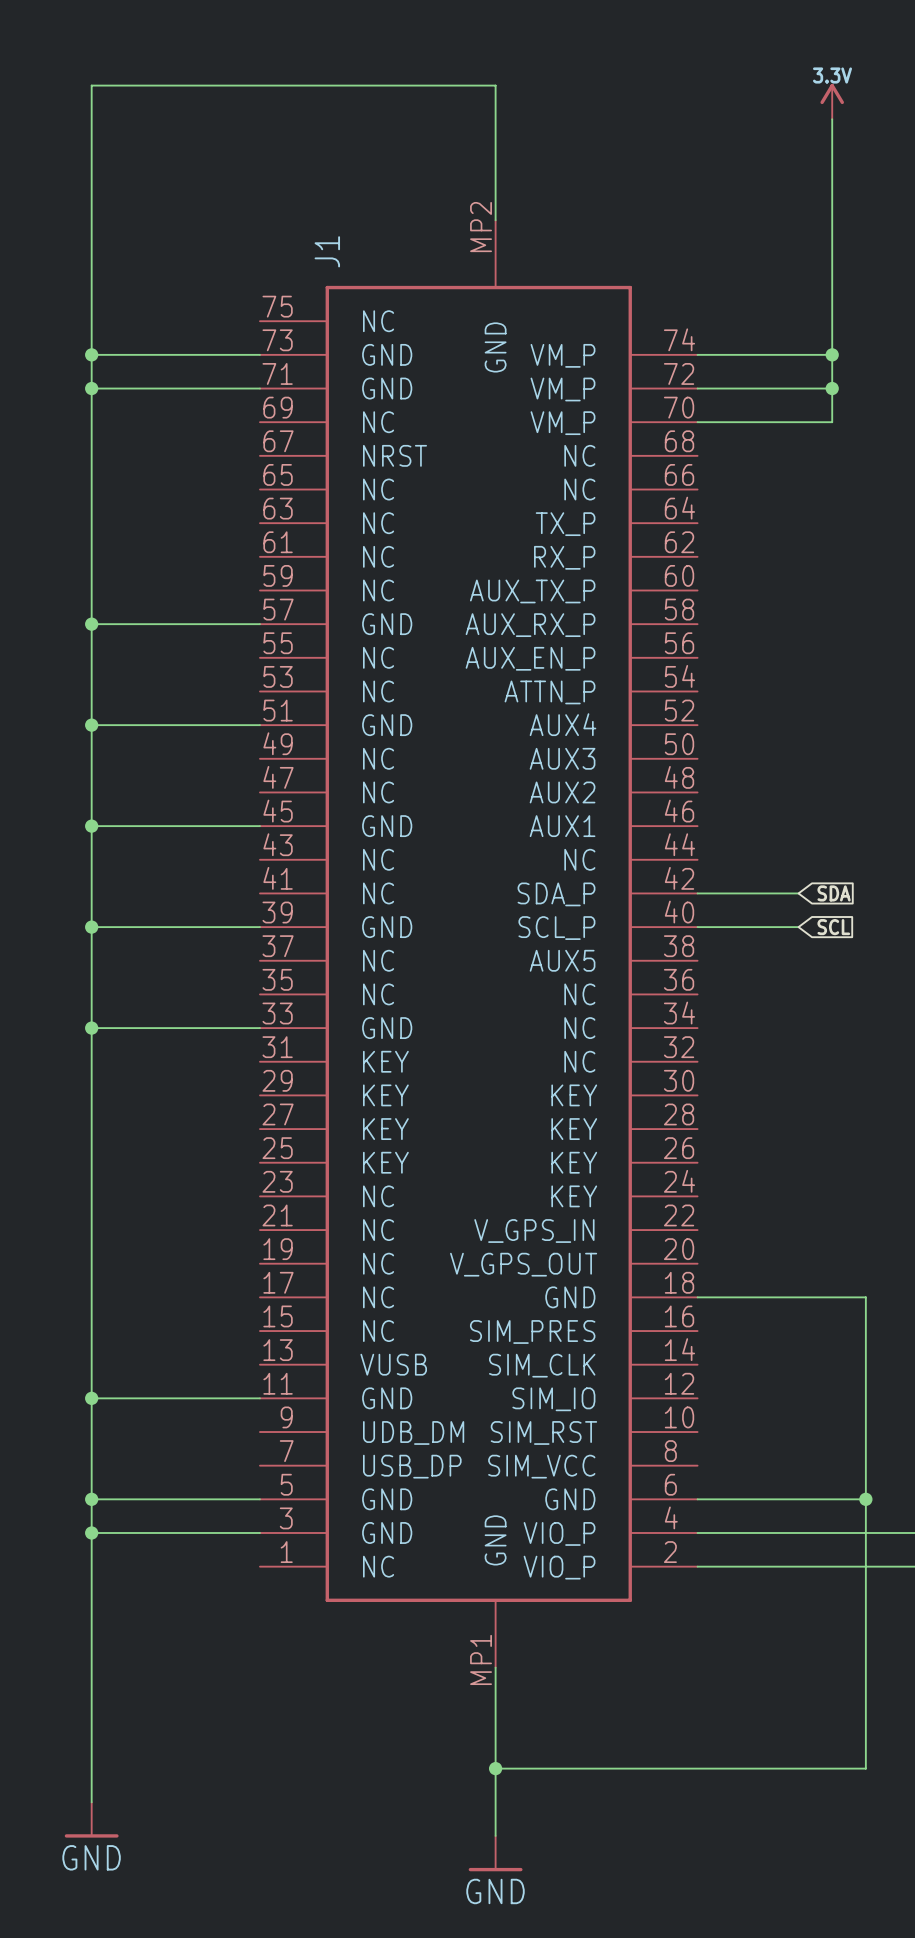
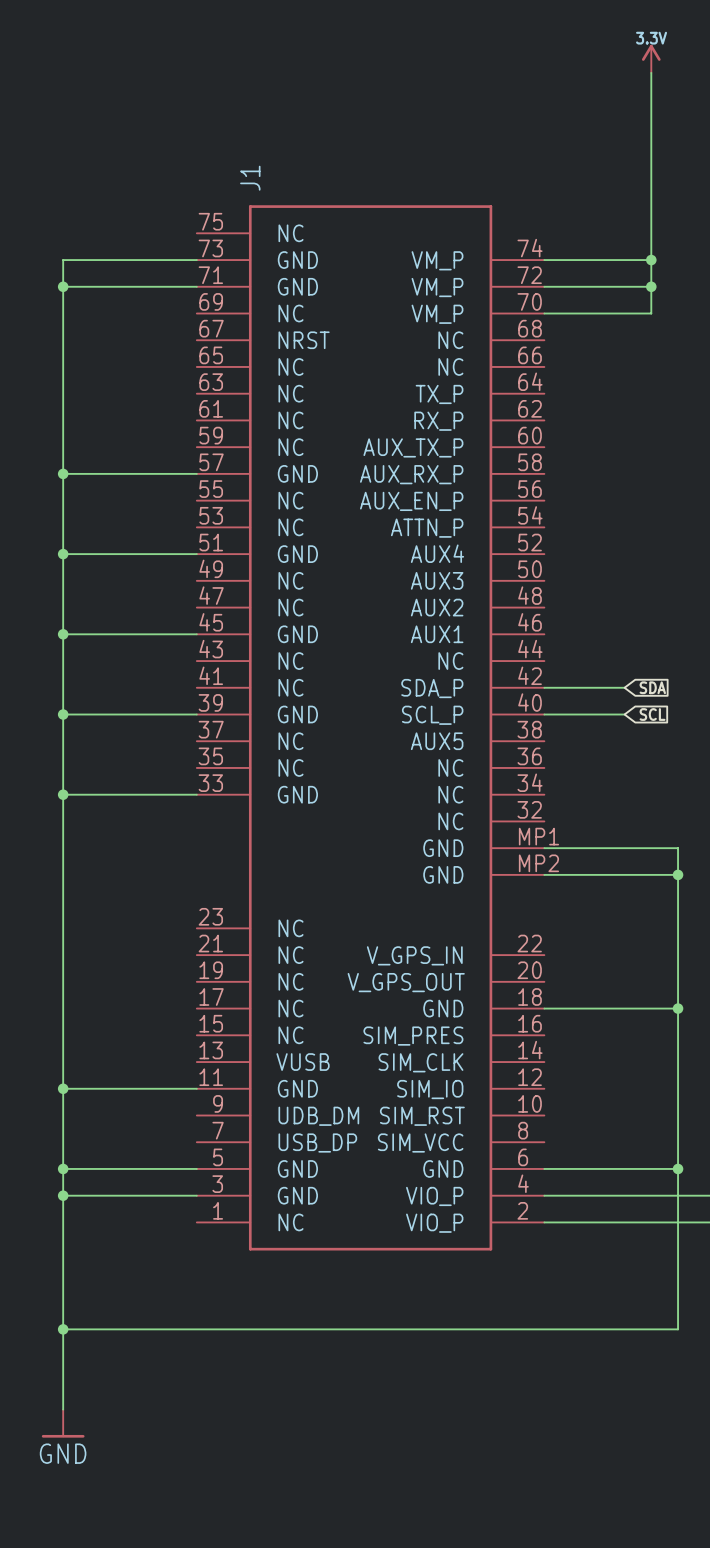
J1 symbol: [259, 220, 698, 1668] -> [196, 205, 545, 1251]
wire: (495, 220) (495, 85) (91, 85) (91, 354) -> none
junction: (91, 354) -> none
wire: none -> (544, 848) (678, 848) (678, 1008)
wire: none -> (544, 874) (678, 874)
junction: none -> (678, 874)
junction: none -> (678, 1008)
wire: (495, 1667) (495, 1835) -> none
junction: none -> (63, 1329)
wire: (865, 1701) (865, 1768) (495, 1768) -> (678, 1329) (63, 1329)
junction: (495, 1768) -> none
power symbol: GND (495, 1853) -> none

